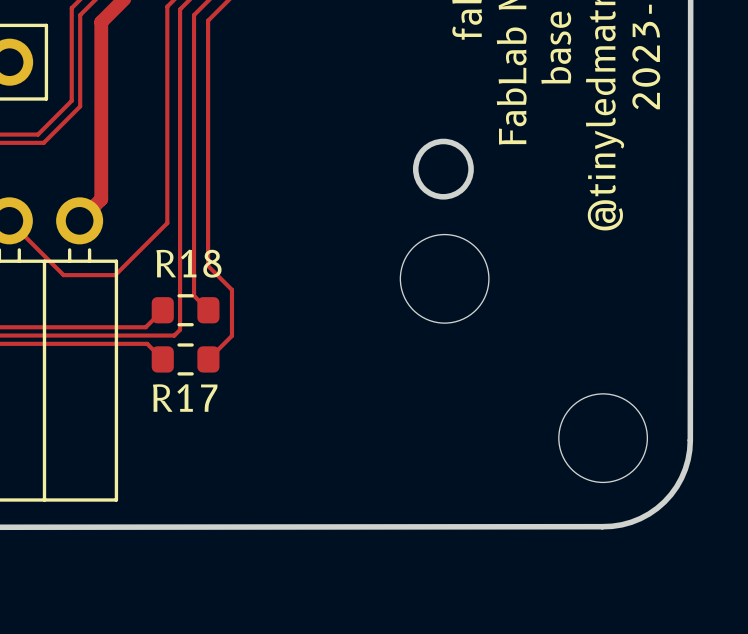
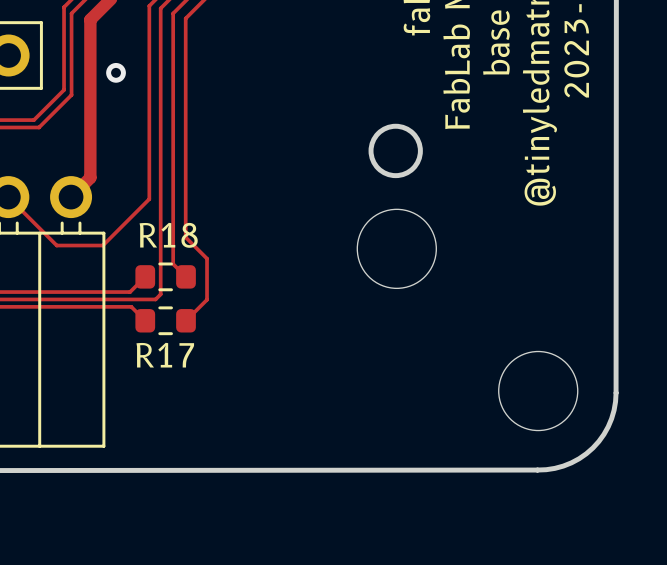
via: none -> (116, 72)

